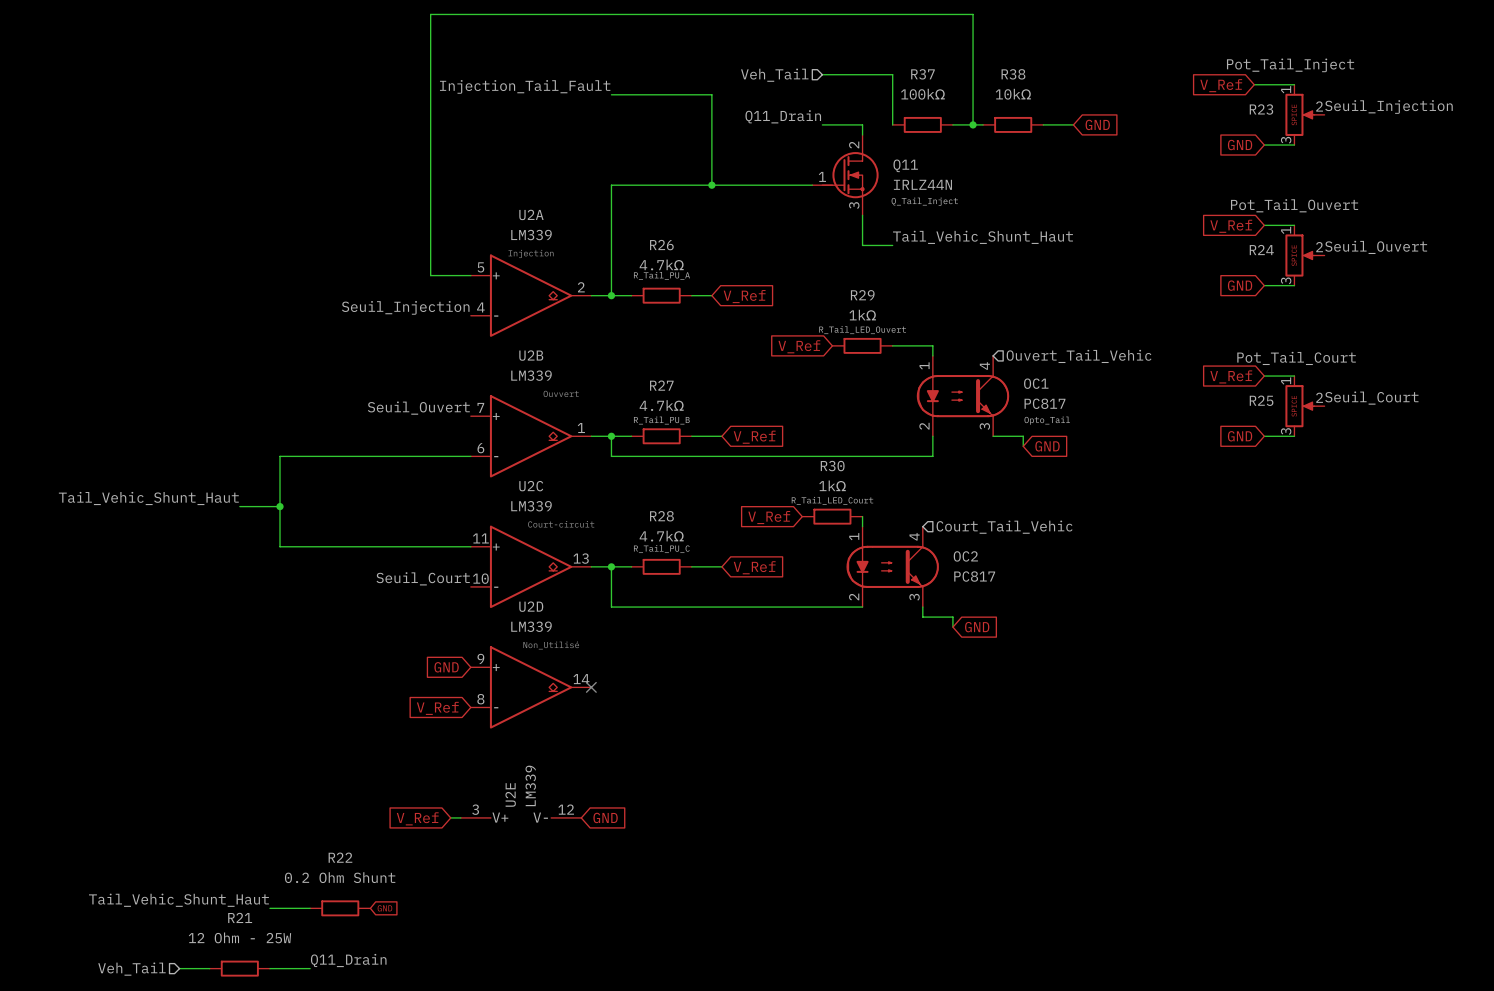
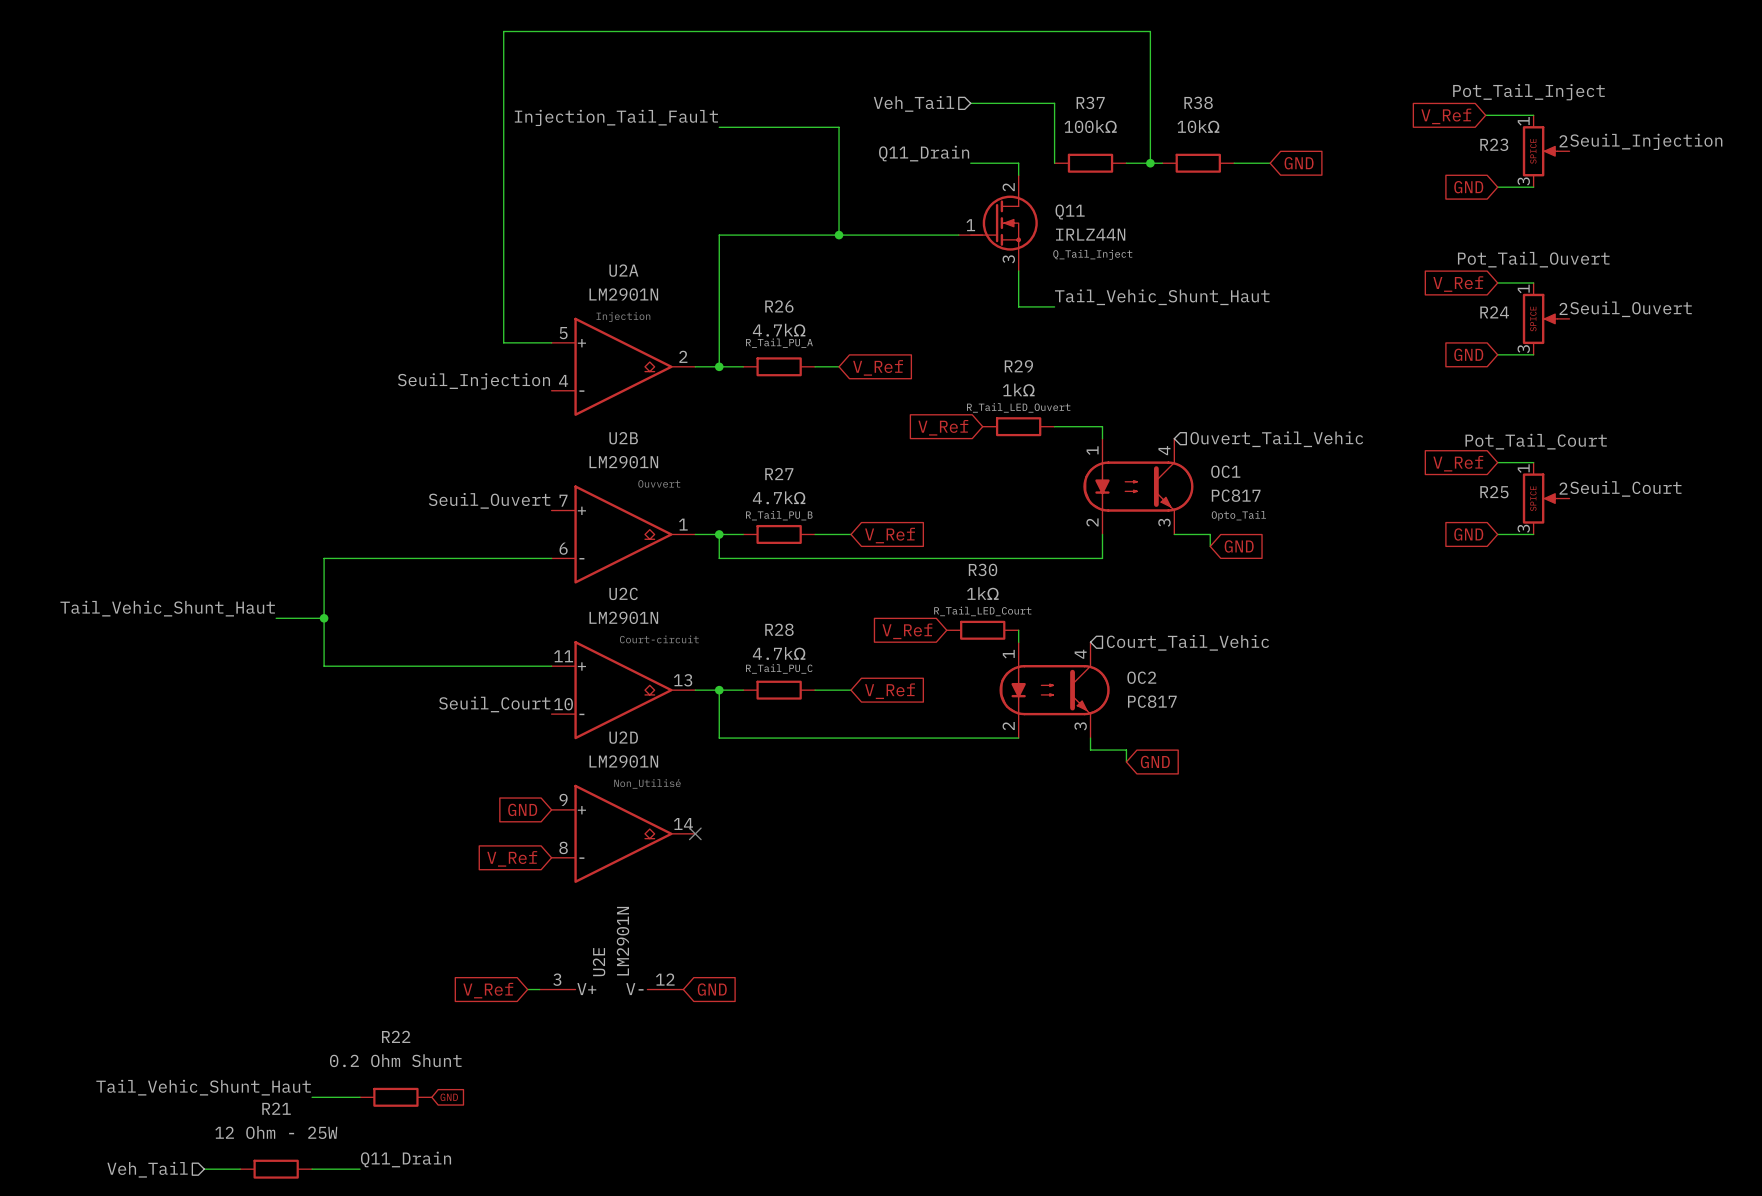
U2A value: LM339 (531, 235) -> LM2901N (623, 294)
U2B value: LM339 (531, 375) -> LM2901N (623, 462)
U2C value: LM339 (531, 506) -> LM2901N (623, 617)
U2D value: LM339 (531, 626) -> LM2901N (623, 761)
U2E value: LM339 (530, 785) -> LM2901N (623, 941)

